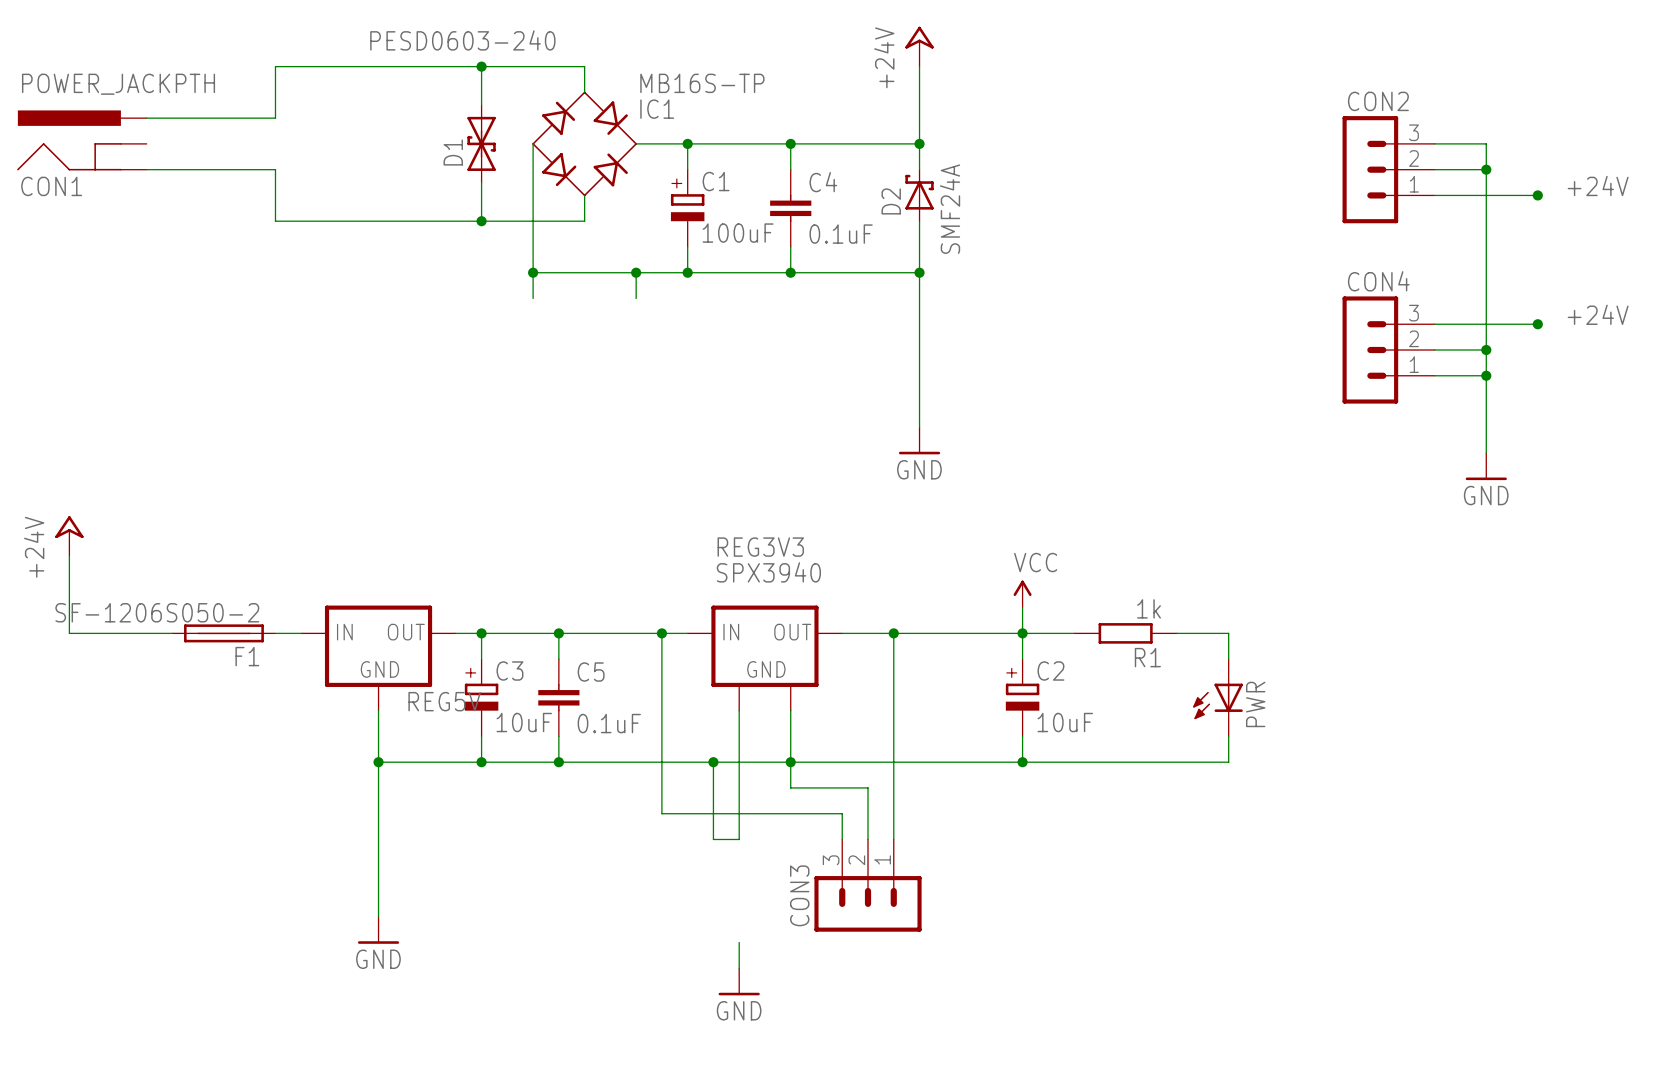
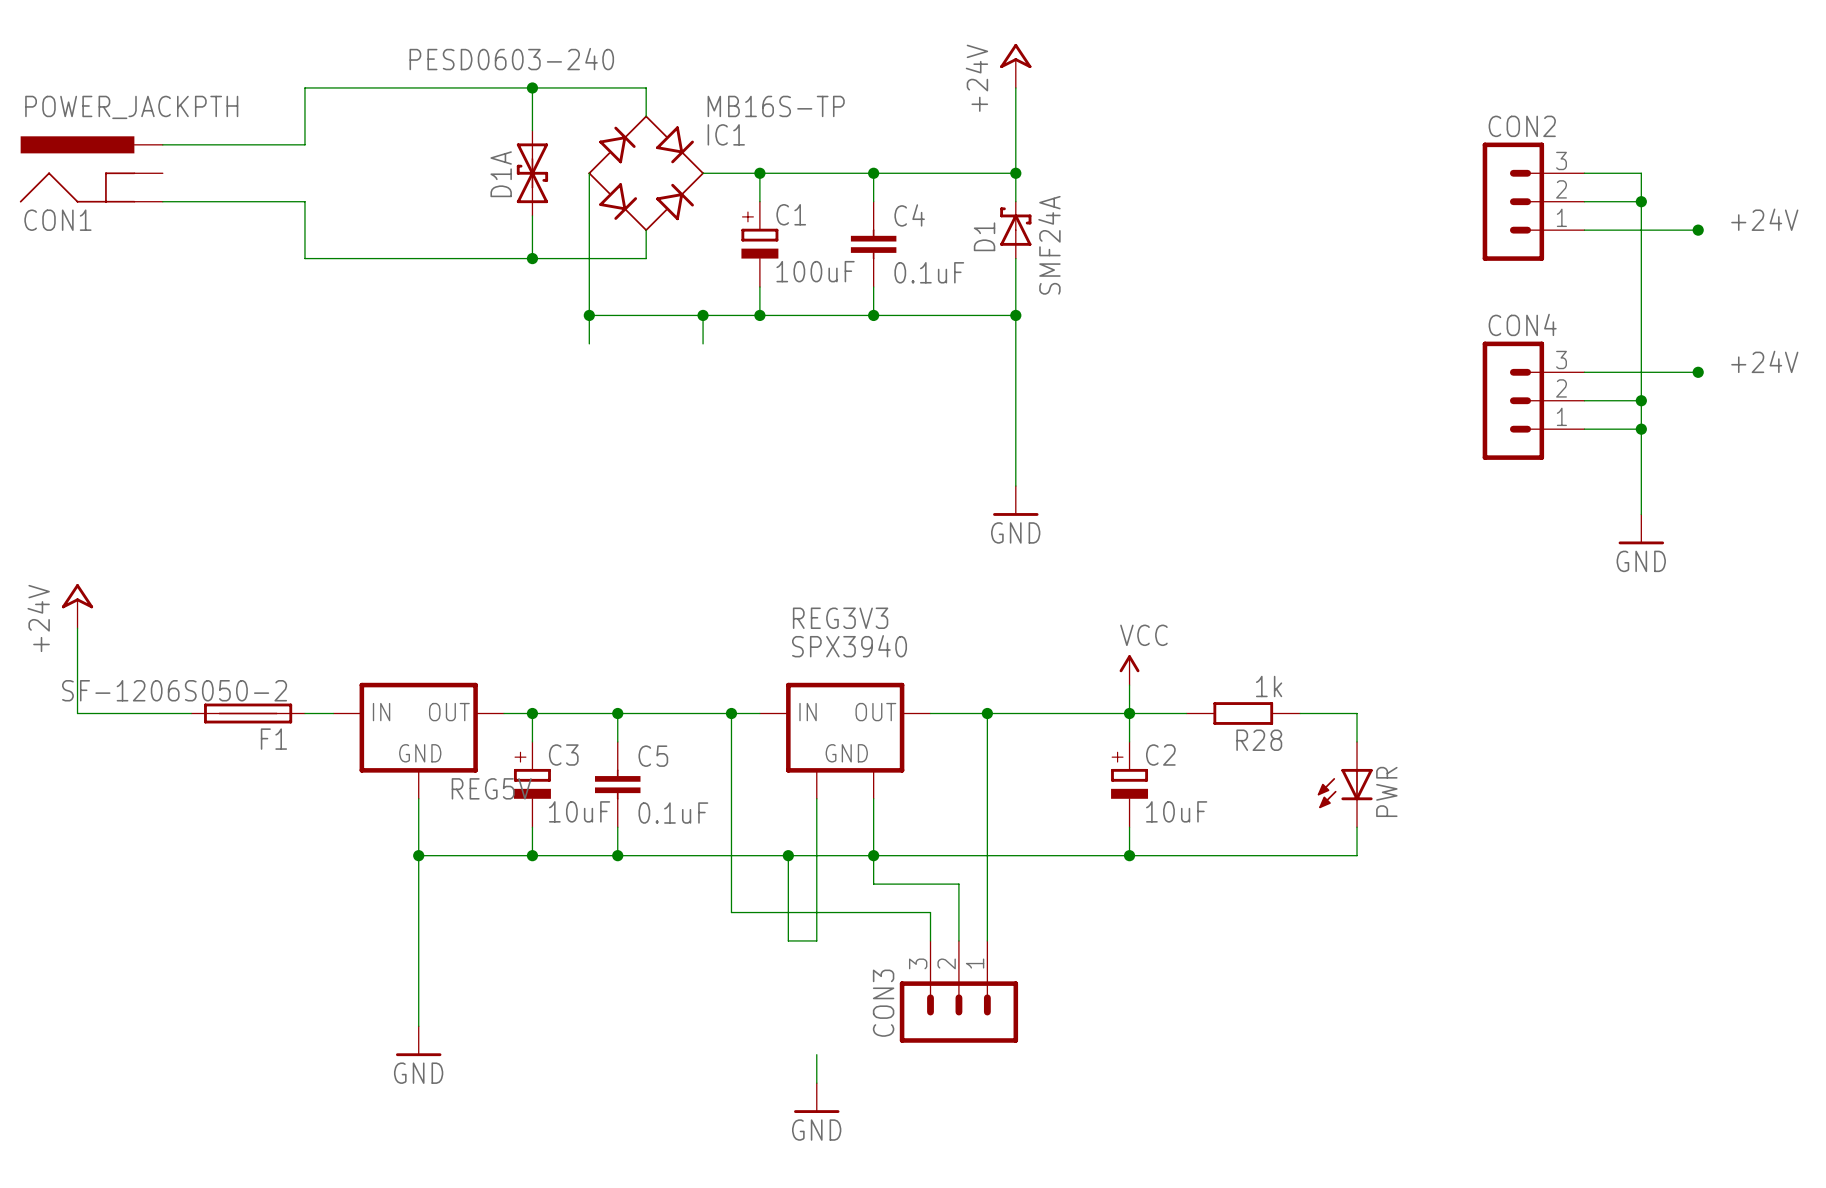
D1 name: D1 (453, 152) -> D1A (501, 174)
D2 name: D2 (891, 201) -> D1 (984, 236)
R1 name: R1 (1147, 657) -> R28 (1259, 740)

